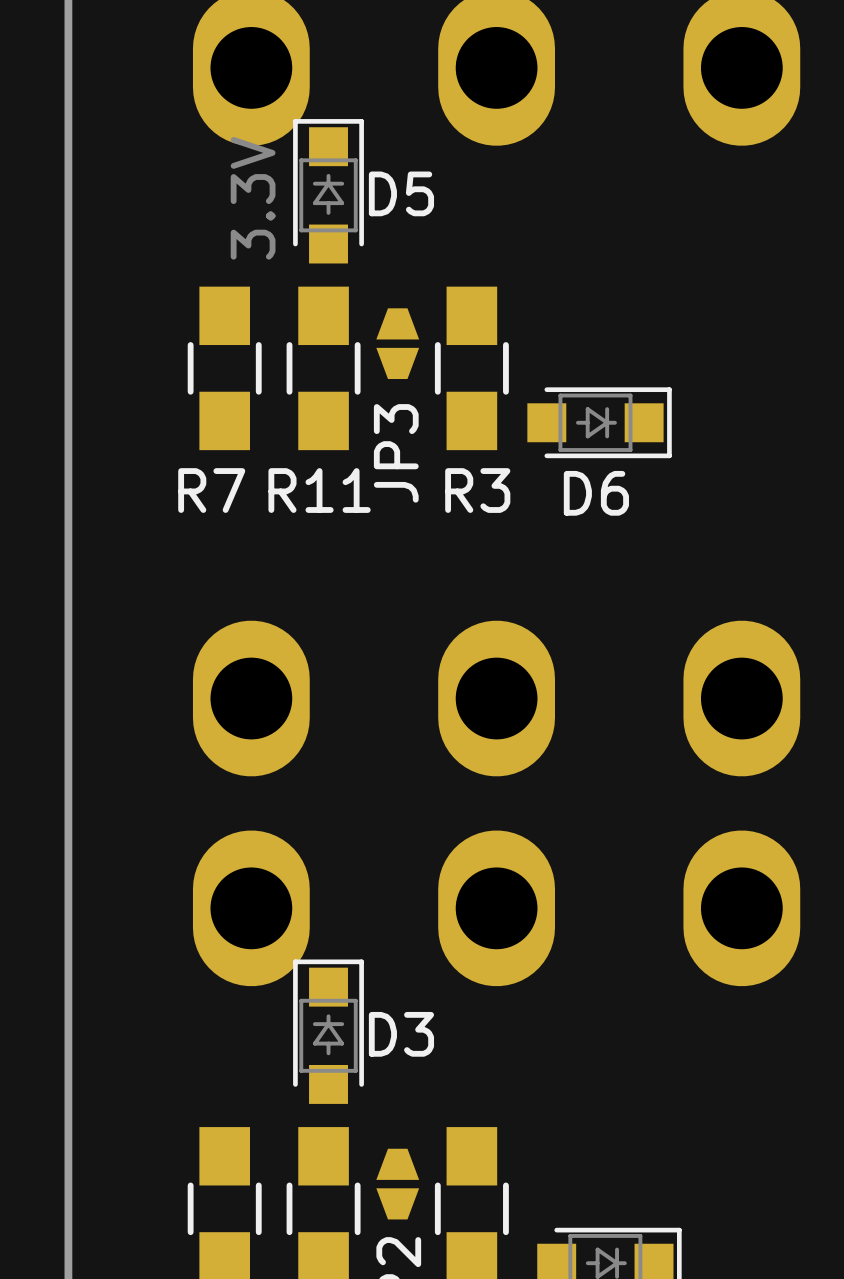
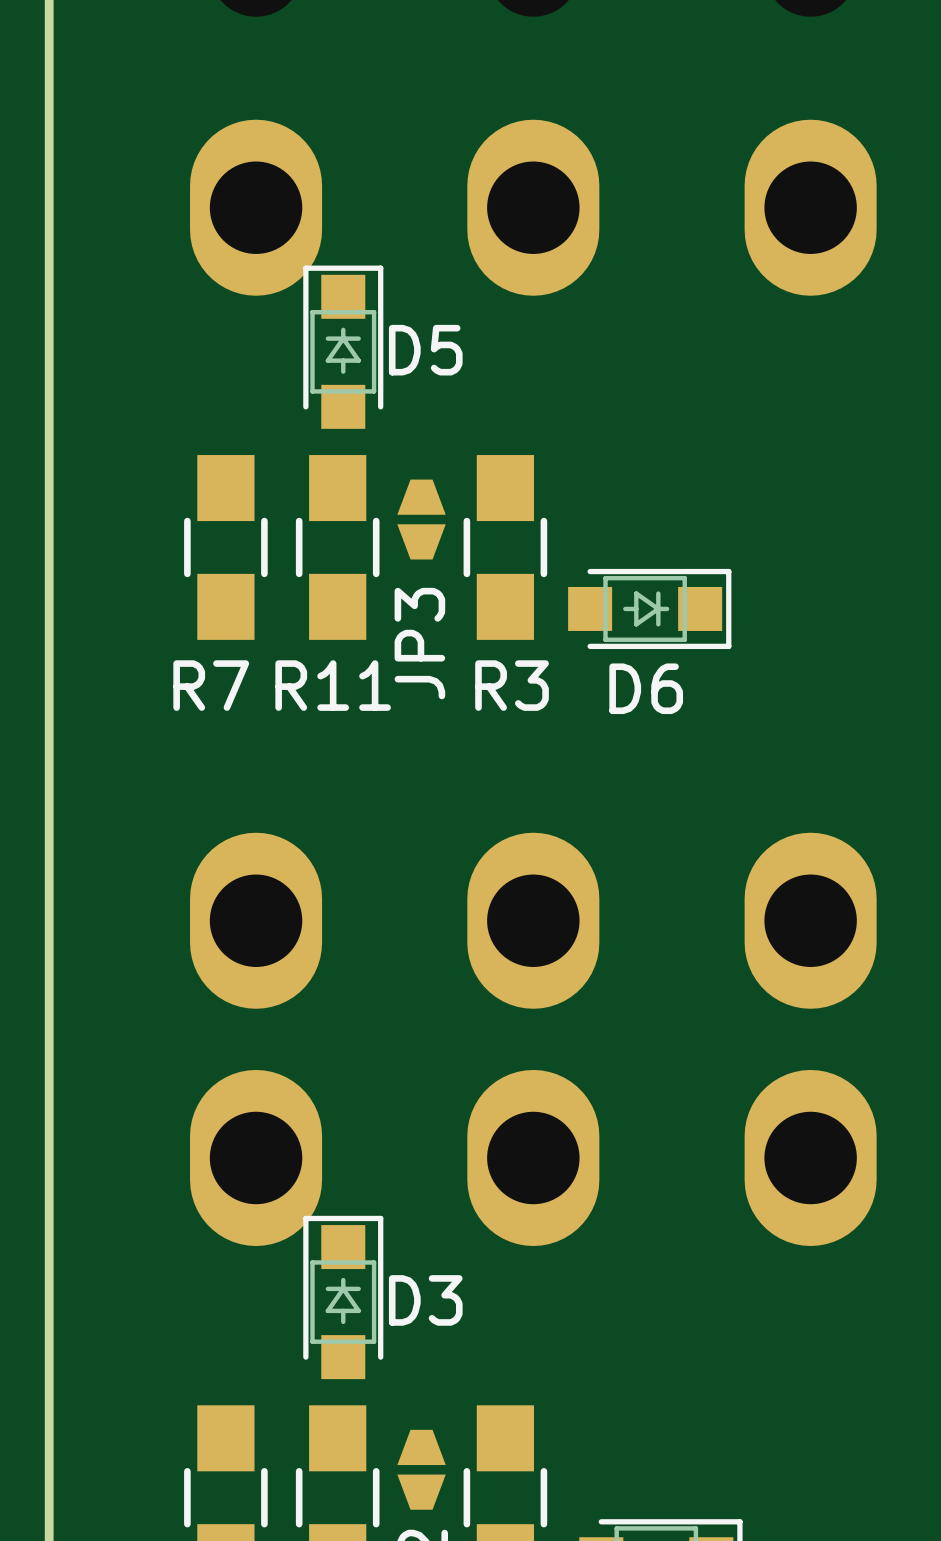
D5 value: 3.3V (253, 198) -> none

